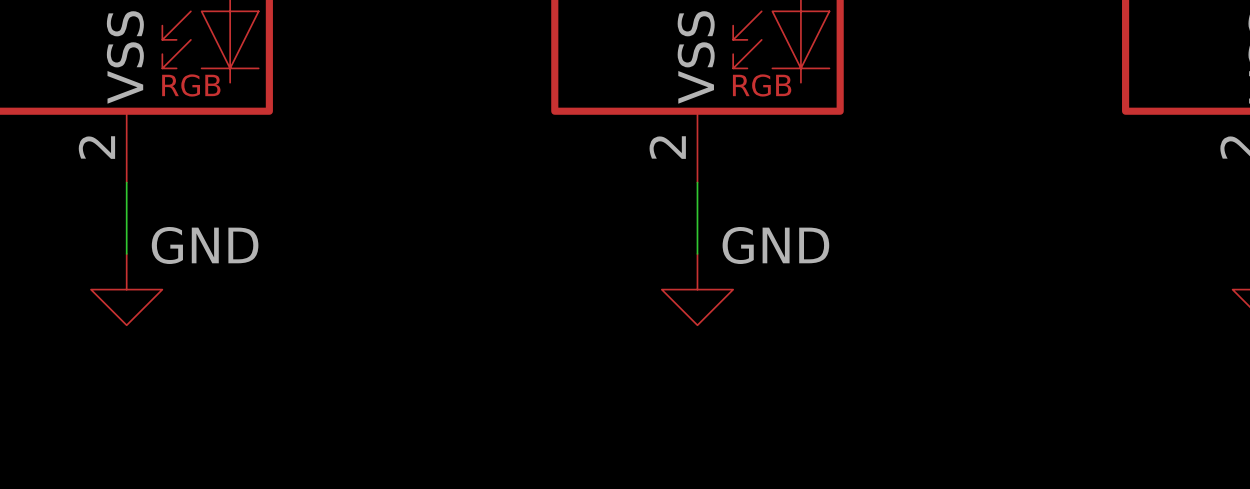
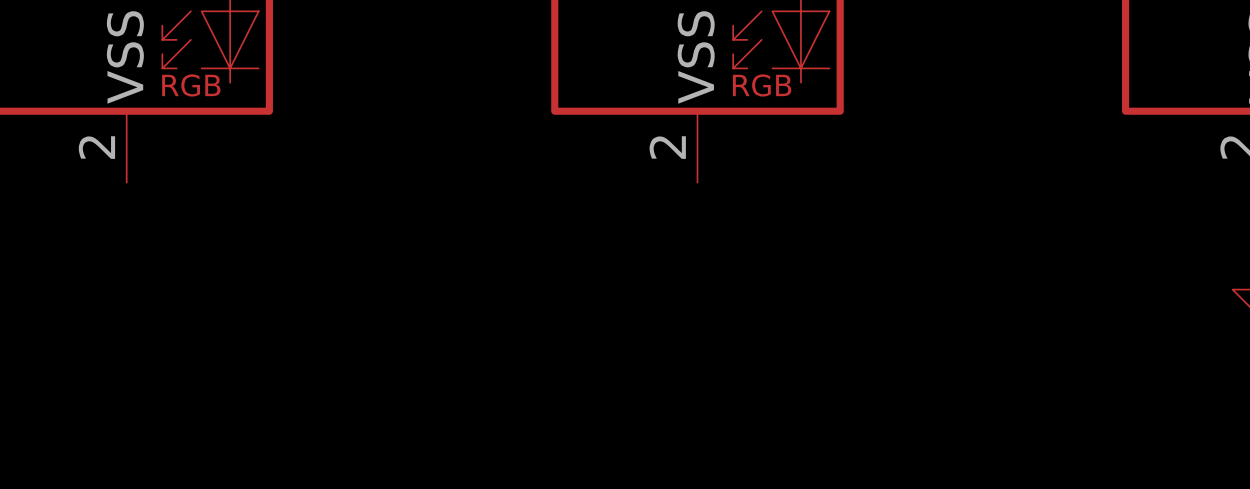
wire: (126, 182) (126, 253) -> none
wire: (697, 182) (697, 253) -> none
power symbol: GND (126, 289) -> none
power symbol: GND (697, 289) -> none

